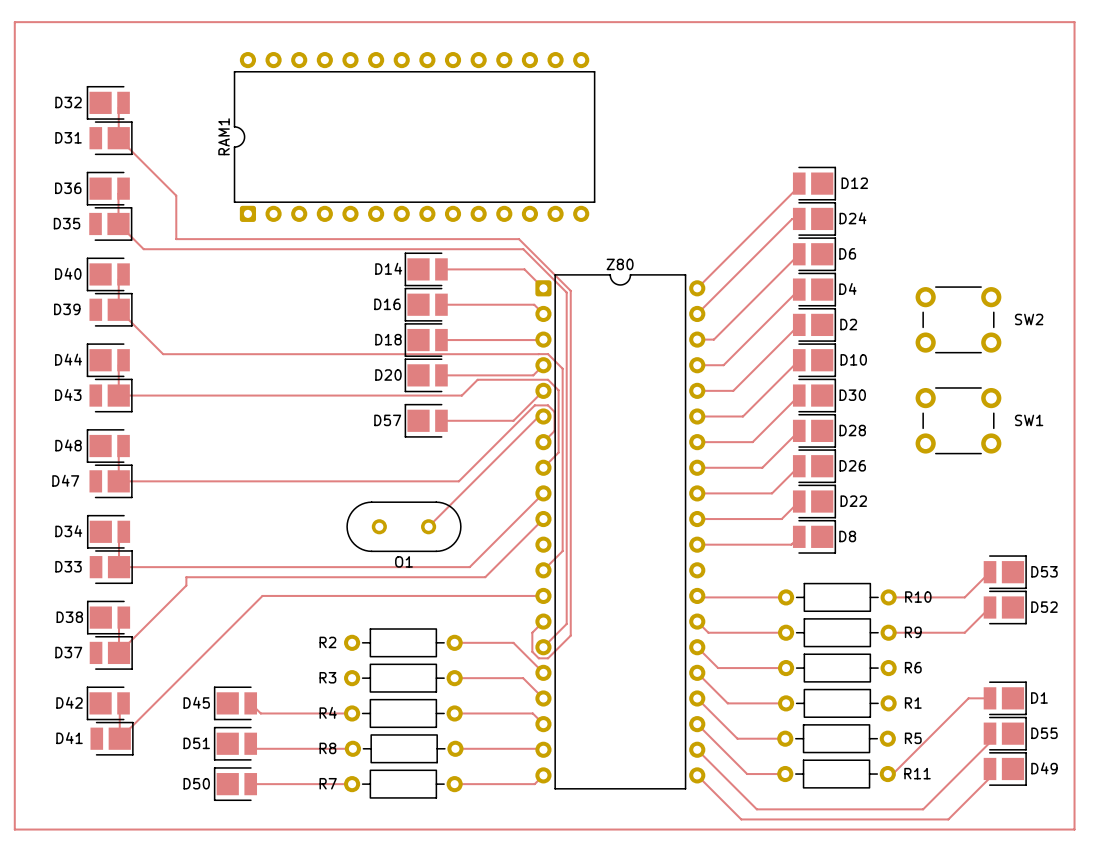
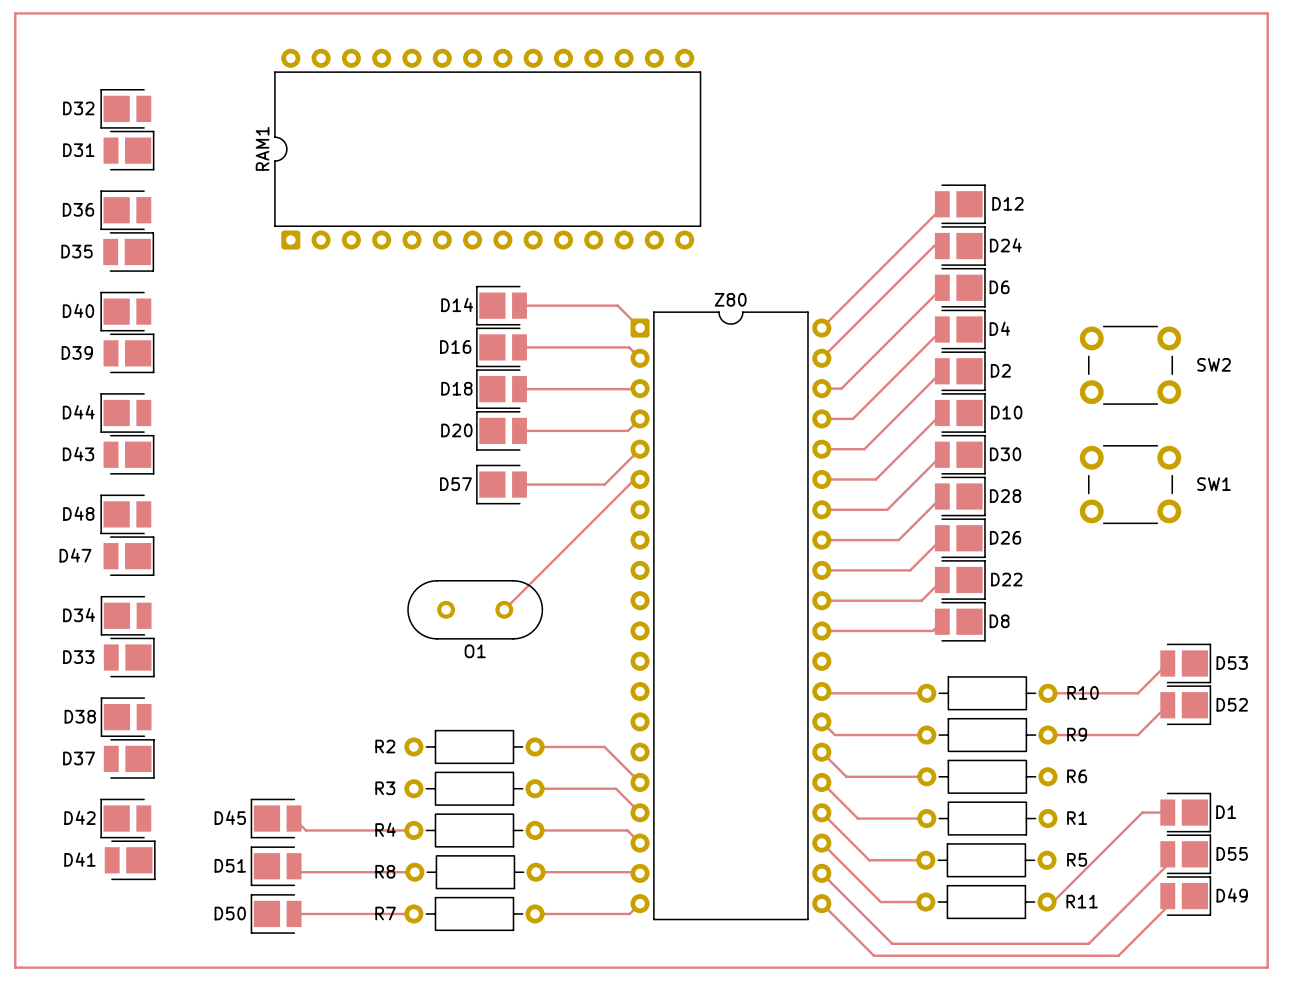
track: (123, 102) (118, 107) (118, 138) (176, 195) (176, 239) (519, 239) (570, 290) (570, 635) (548, 658) (538, 658) (532, 651) (532, 632) (543, 621) -> none
track: (123, 188) (118, 193) (118, 223) (143, 249) (523, 249) (566, 292) (566, 623) (543, 647) -> none
track: (123, 274) (118, 279) (118, 309) (163, 354) (538, 354) -> none
track: (538, 354) (548, 354) (562, 368) (562, 551) (543, 570) -> none
track: (123, 360) (118, 365) (118, 395) (461, 395) (477, 379) (548, 379) (558, 390) (558, 452) (543, 467) -> none
track: (543, 442) (554, 431) (554, 411) (548, 405) (534, 405) (458, 481) (118, 481) (118, 450) (123, 446) -> none
track: (543, 493) (469, 567) (119, 567) (119, 536) (123, 531) -> none
track: (543, 519) (485, 577) (186, 577) (186, 585) (119, 652) (119, 622) (123, 617) -> none
track: (543, 595) (262, 595) (119, 738) (119, 707) (123, 703) -> none

